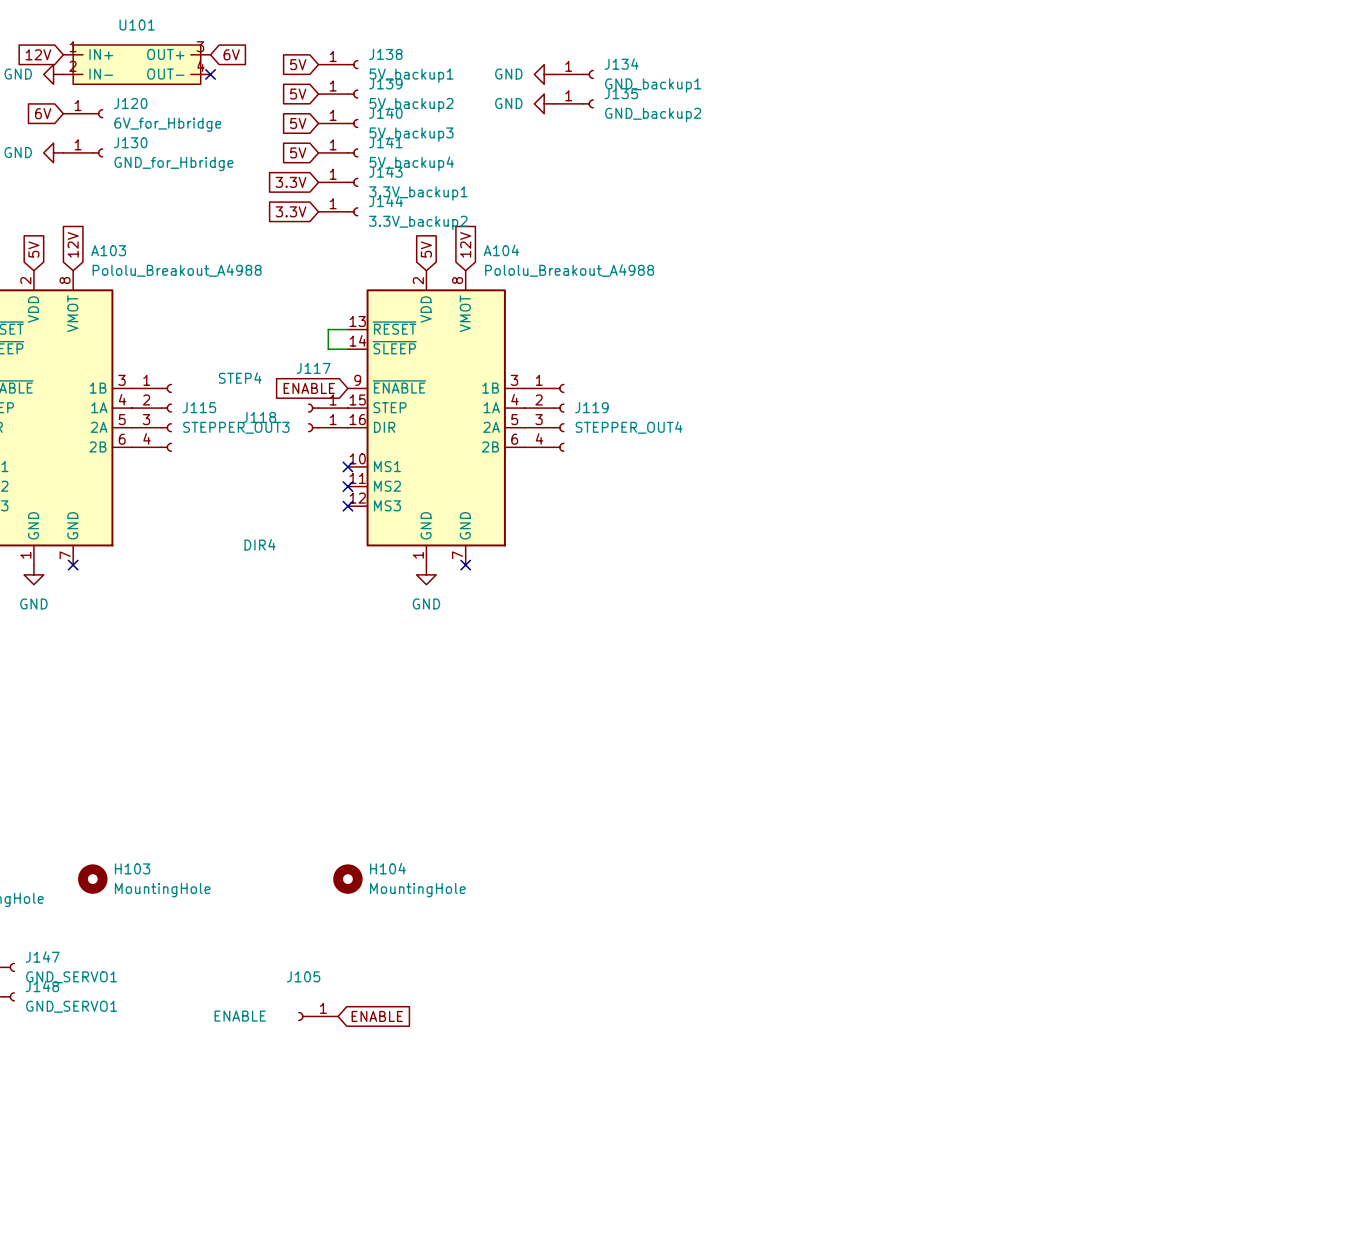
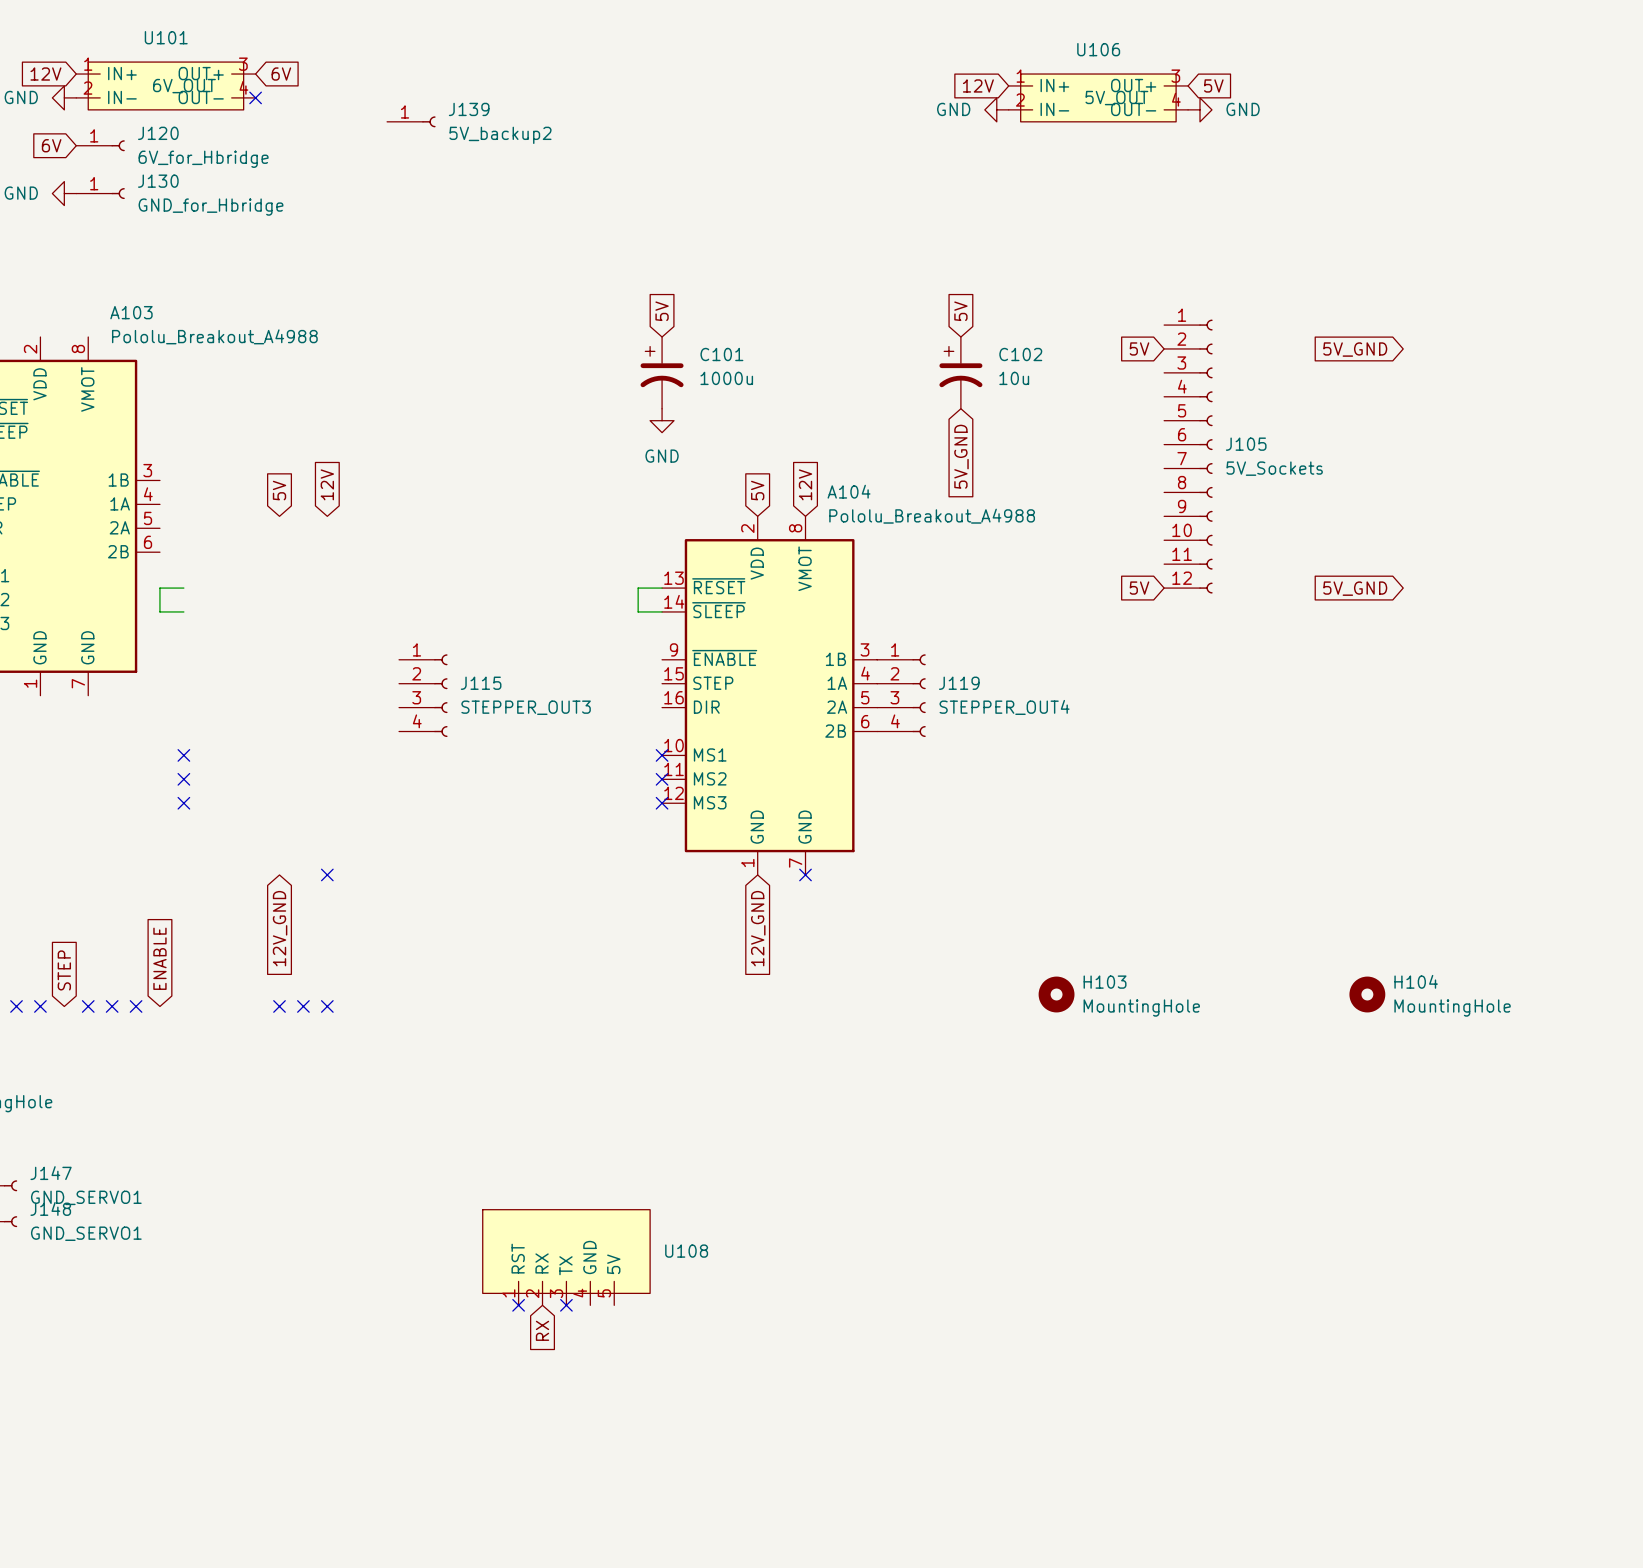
U101 value: none -> 6V_OUT (184, 86)
global label: 5V (298, 64) -> none
J138: 5V_backup1 (338, 64) -> none
global label: none -> 12V (978, 85)
global label: none -> 5V (1213, 85)
power symbol: GND (544, 74) -> none
J134: GND_backup1 (573, 74) -> none
U106: none -> 5V_OUT (1098, 97)
power symbol: none -> GND (996, 109)
power symbol: none -> GND (1200, 109)
global label: 5V (298, 94) -> none
power symbol: GND (544, 103) -> none
J135: GND_backup2 (573, 103) -> none
global label: 5V (298, 123) -> none
J140: 5V_backup3 (338, 123) -> none
global label: 5V (298, 152) -> none
J141: 5V_backup4 (338, 152) -> none
global label: 3.3V (291, 182) -> none
J143: 3.3V_backup1 (338, 182) -> none
global label: 3.3V (291, 211) -> none
J144: 3.3V_backup2 (338, 211) -> none
global label: 12V (73, 244) -> none
global label: 12V (465, 244) -> none
global label: 5V (33, 249) -> none
global label position: 5V (426, 249) -> 5V (662, 311)
global label: none -> 5V (960, 311)
global label: none -> 5V (1139, 348)
global label: none -> 5V_GND (1355, 349)
C101: none -> 1000u (662, 372)
C102: none -> 10u (960, 372)
wire: (347, 329) (328, 329) (328, 349) (347, 349) -> none
power symbol: none -> GND (662, 420)
global label: none -> 5V_GND (961, 456)
global label: ENABLE (309, 388) -> none
global label: none -> 12V (327, 484)
global label: none -> 12V (805, 484)
global label: none -> 5V (279, 490)
global label: none -> 5V (757, 490)
J117: STEP4 (328, 408) -> none
J115 position: (151, 417) -> (423, 695)
A104 position: (436, 417) -> (769, 695)
J119 position: (544, 417) -> (901, 695)
J118: DIR4 (328, 427) -> none
no-connect mark: (347, 466) -> none
wire: none -> (183, 588) (159, 588) (159, 611) (183, 611)
wire: none -> (662, 588) (638, 588) (638, 611) (662, 611)
global label: none -> 5V (1139, 588)
global label: none -> 5V_GND (1355, 588)
no-connect mark: (347, 486) -> none
no-connect mark: (347, 506) -> none
no-connect mark: (73, 565) -> none
no-connect mark: (465, 565) -> none
power symbol: GND (33, 574) -> none
power symbol: GND (426, 574) -> none
no-connect mark: none -> (183, 755)
no-connect mark: none -> (662, 755)
no-connect mark: none -> (183, 779)
no-connect mark: none -> (662, 779)
no-connect mark: none -> (183, 803)
no-connect mark: none -> (662, 803)
no-connect mark: none -> (327, 874)
no-connect mark: none -> (805, 874)
global label: none -> 12V_GND (280, 928)
global label: none -> 12V_GND (758, 928)
global label: none -> ENABLE (159, 958)
global label: none -> STEP (64, 970)
no-connect mark: none -> (16, 1006)
no-connect mark: none -> (40, 1006)
no-connect mark: none -> (88, 1006)
no-connect mark: none -> (112, 1006)
no-connect mark: none -> (136, 1006)
no-connect mark: none -> (279, 1006)
no-connect mark: none -> (303, 1006)
no-connect mark: none -> (327, 1006)
H103 position: (92, 879) -> (1056, 994)
H104 position: (347, 879) -> (1367, 994)
J105 name position: J105 (303, 976) -> J105 (1246, 444)
J105 symbol: [298, 1011, 339, 1021] -> [1164, 319, 1213, 594]
J105 value: ENABLE (240, 1016) -> 5V_Sockets (1274, 468)
global label: ENABLE (377, 1016) -> none
U108: none -> (566, 1257)
no-connect mark: none -> (518, 1305)
no-connect mark: none -> (566, 1305)
global label: none -> RX (542, 1330)

